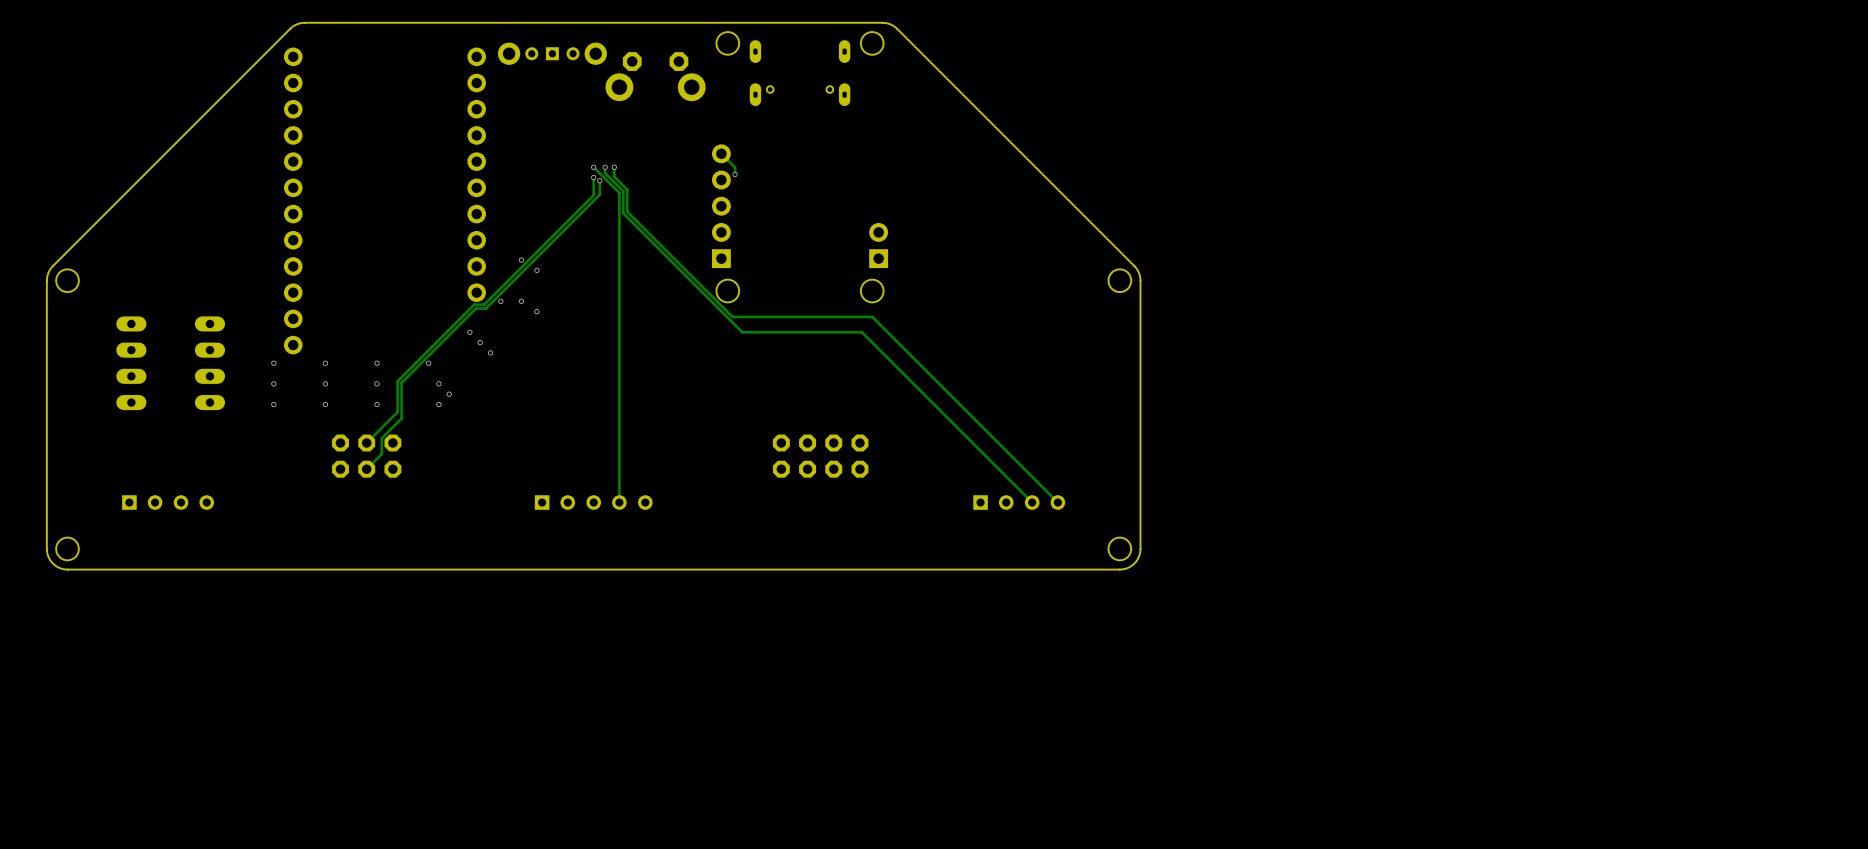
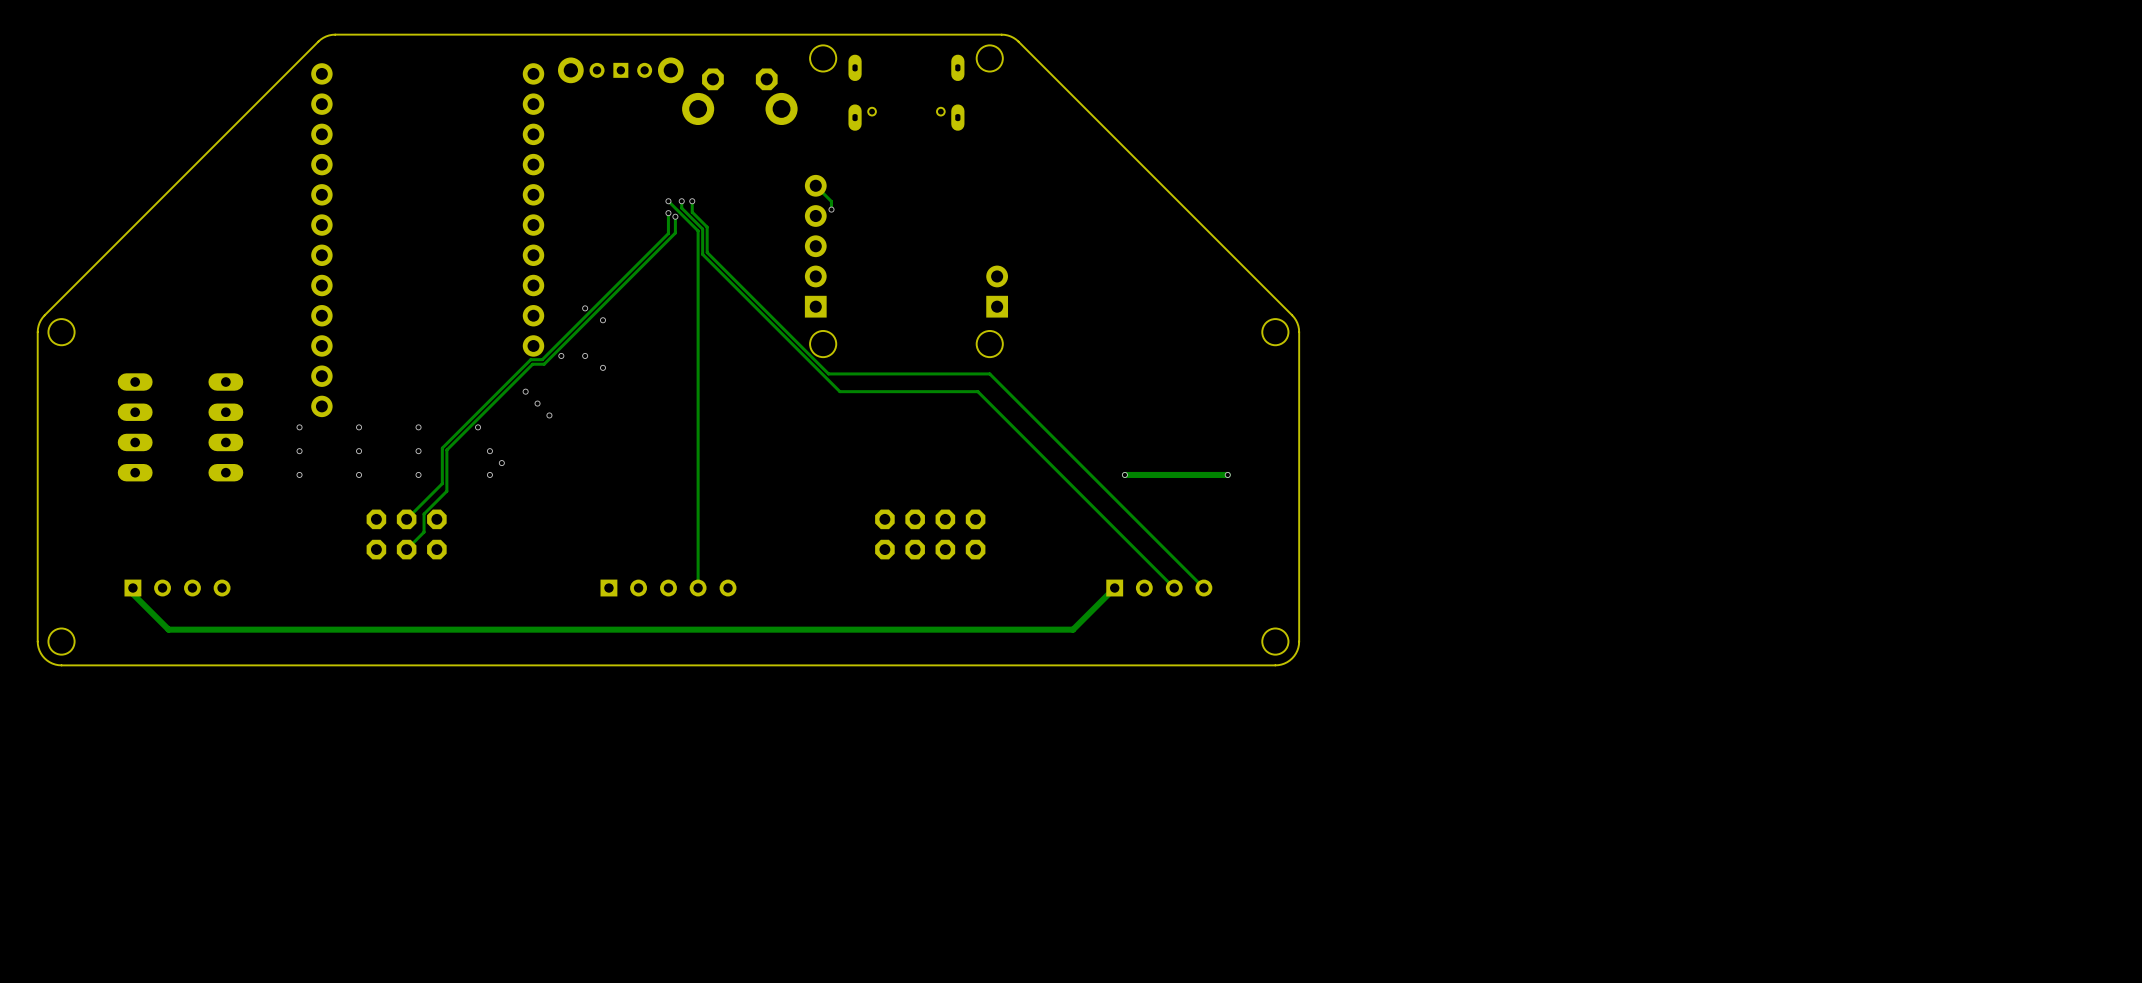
via: none -> (1124, 474)
track: none -> (1227, 474) (1124, 474)
via: none -> (1227, 474)
track: none -> (1114, 588) (1073, 629) (168, 629) (132, 593) (132, 588)

